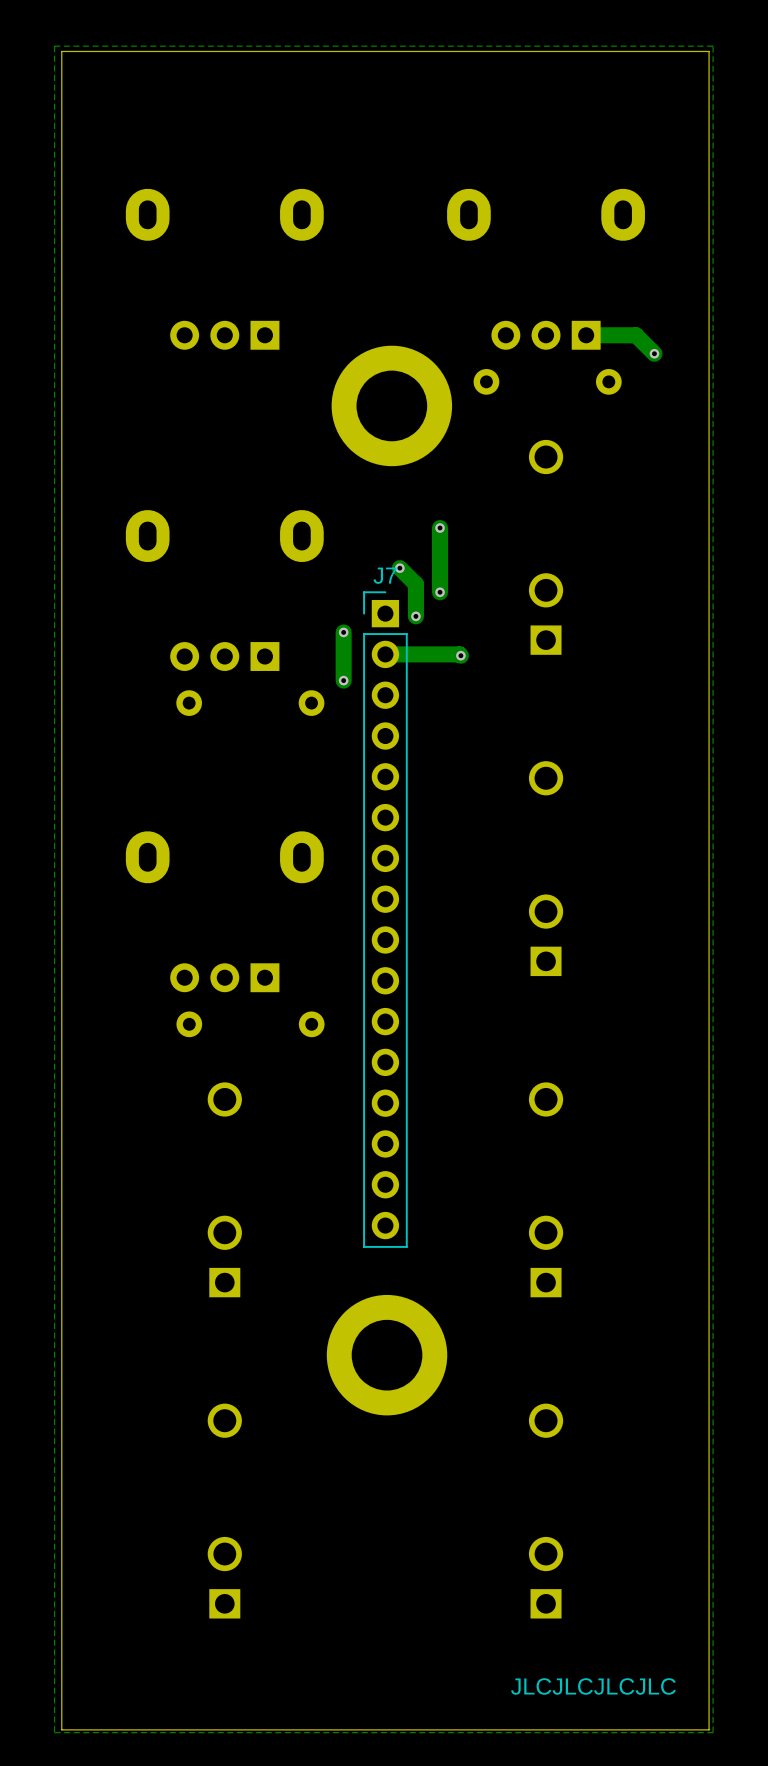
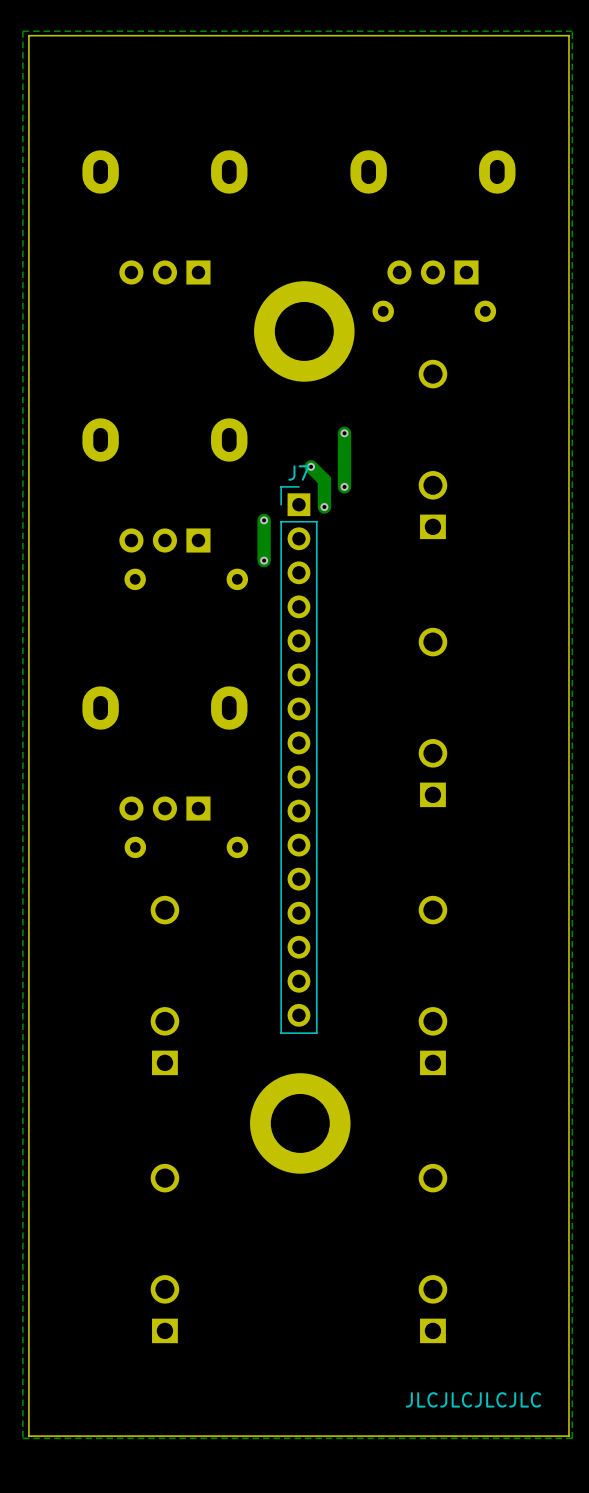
track: (586, 335) (635, 335) (654, 353) -> none
via: (654, 353) -> none
track: (385, 654) (460, 655) -> none
via: (460, 655) -> none

